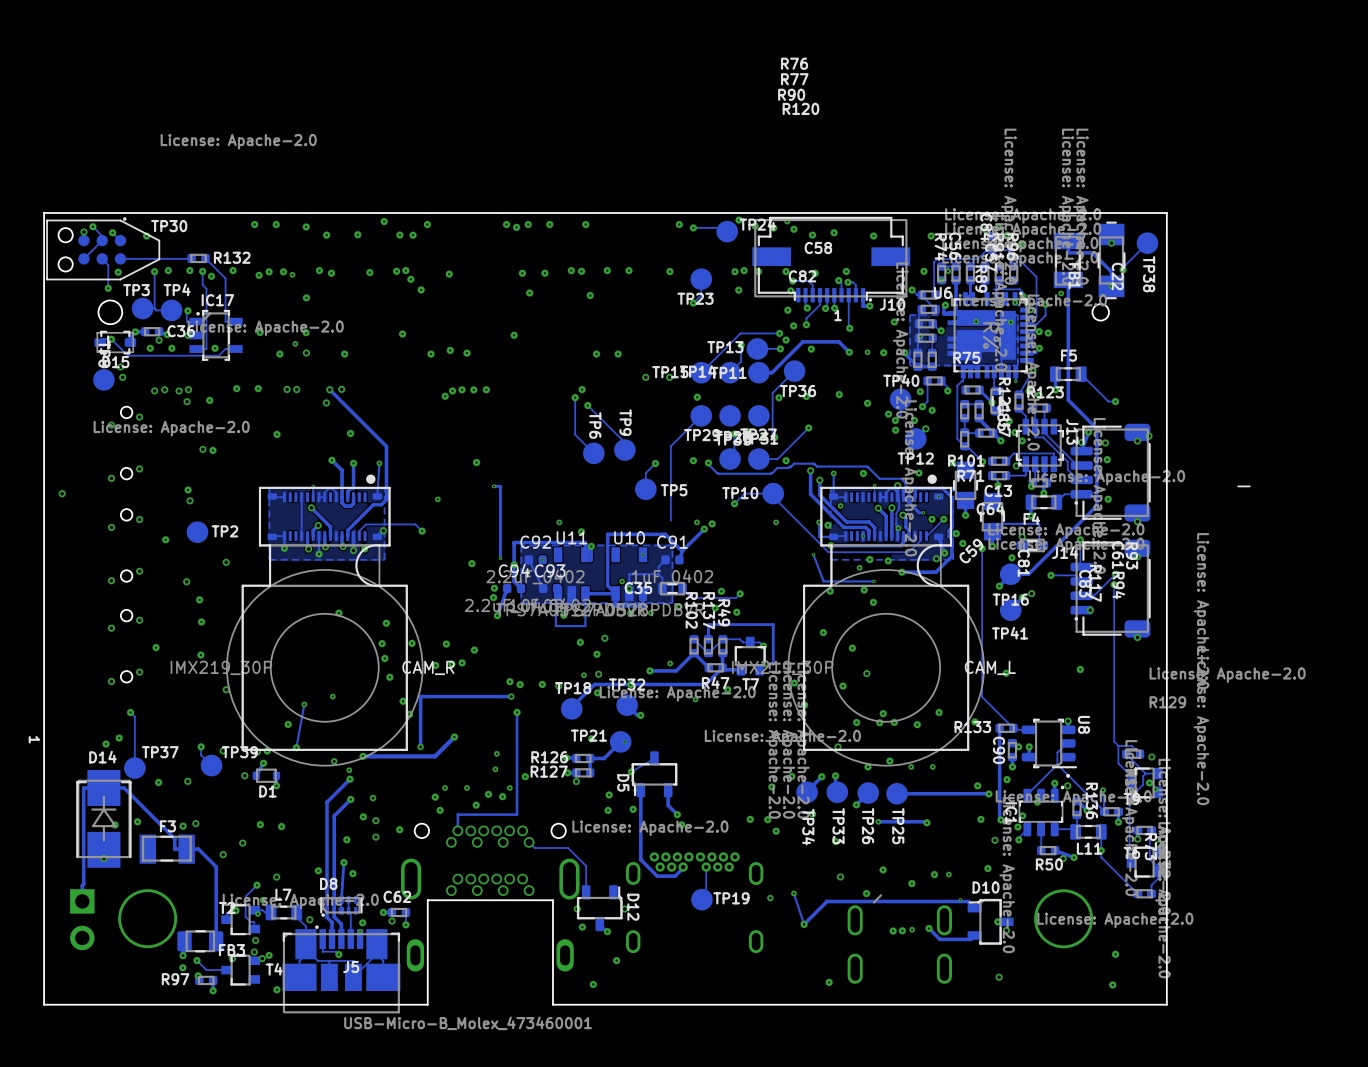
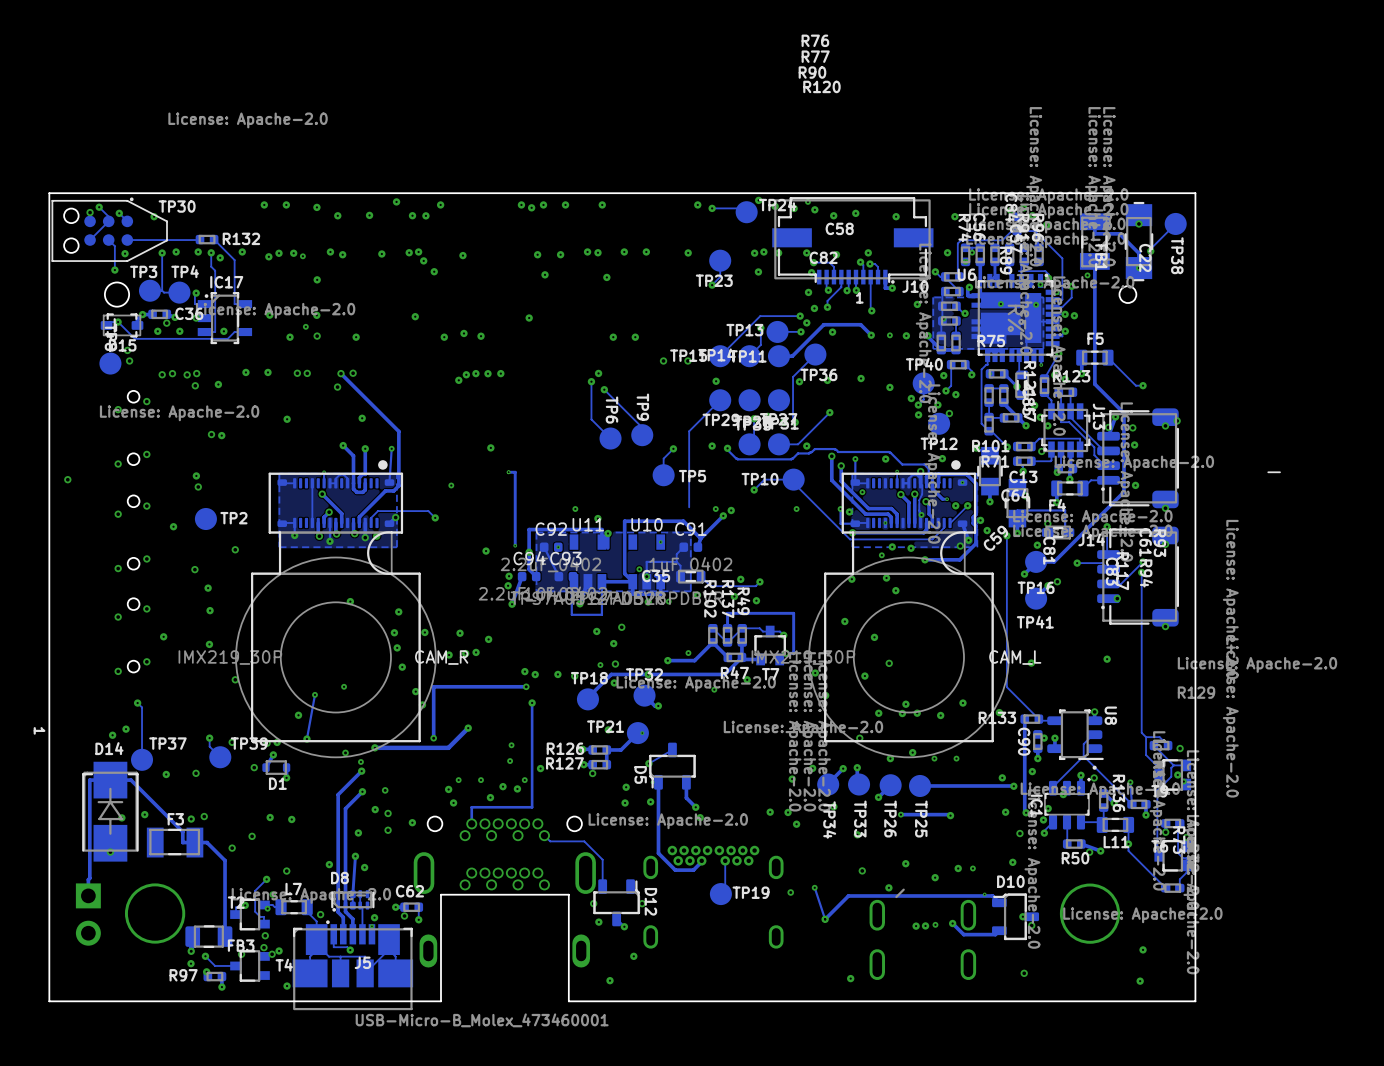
track: (813, 554) (823, 581) (874, 581) -> none
via: (813, 554) -> none
via: (874, 581) -> none

